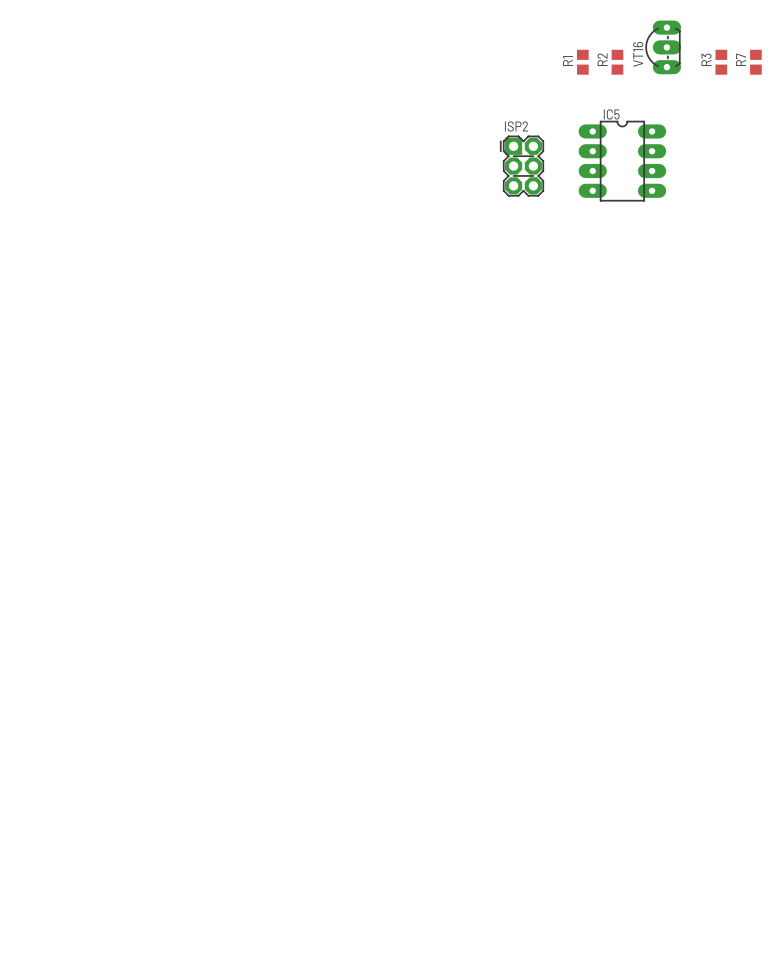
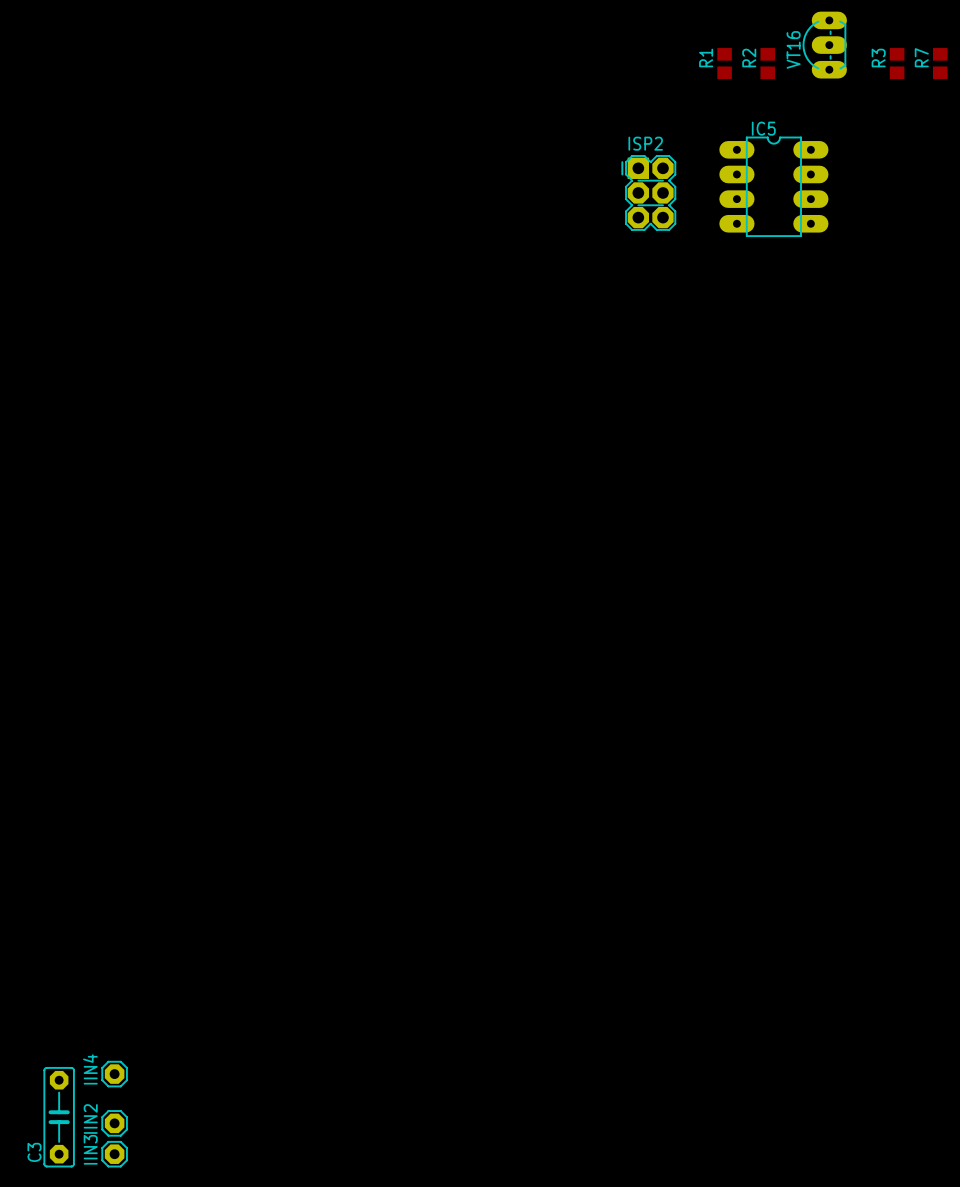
IIN4: none -> (114, 1074)
C3: none -> (59, 1117)
IIN2: none -> (114, 1123)
IIN3: none -> (114, 1154)

